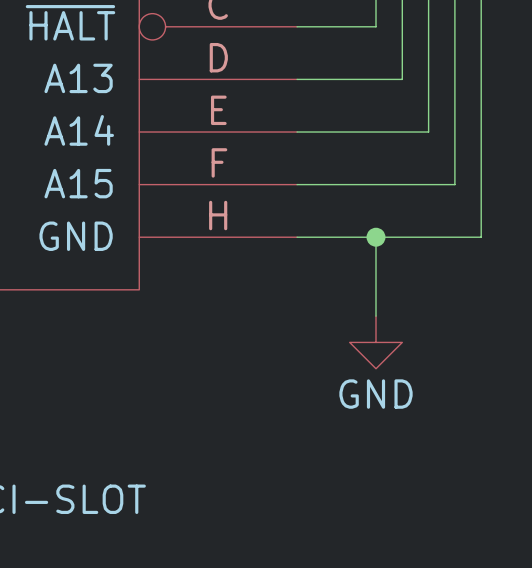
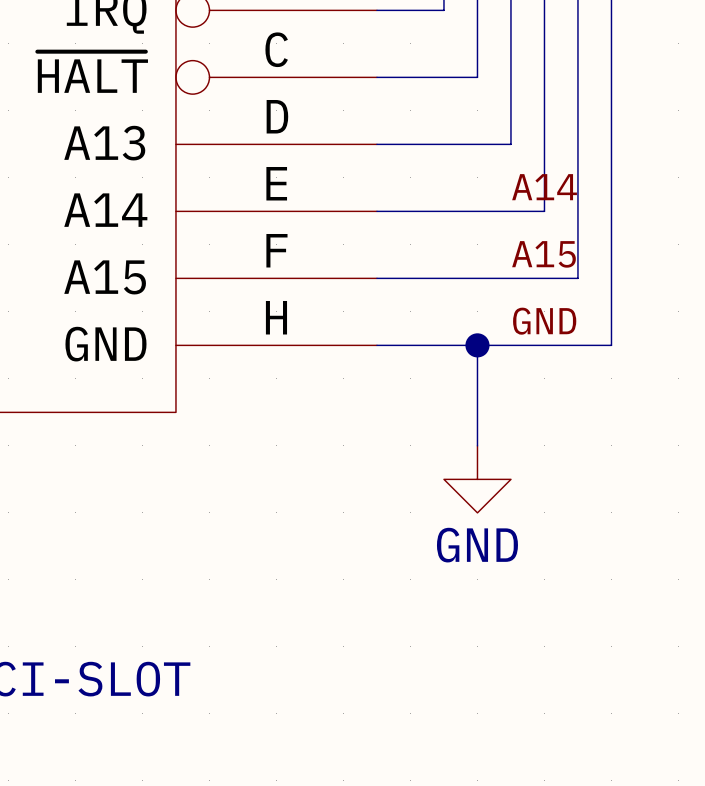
label: none -> A14 (544, 187)
label: none -> A15 (543, 254)
label: none -> GND (544, 321)

